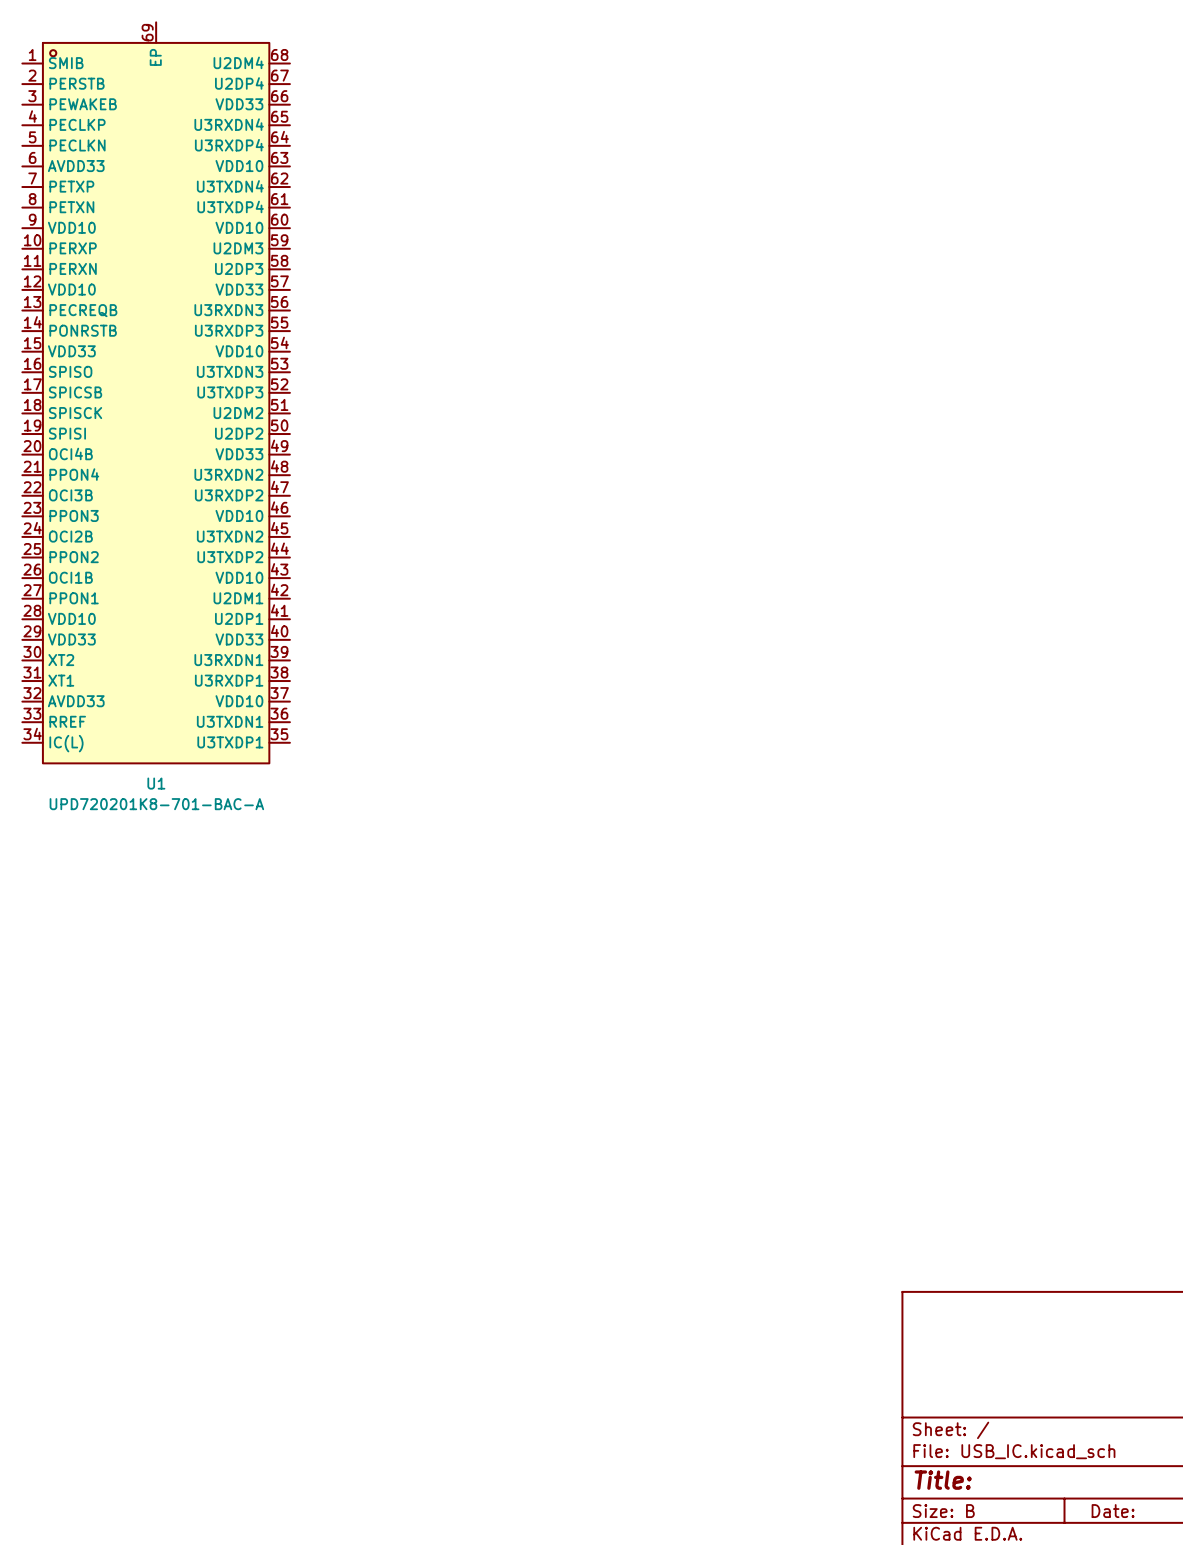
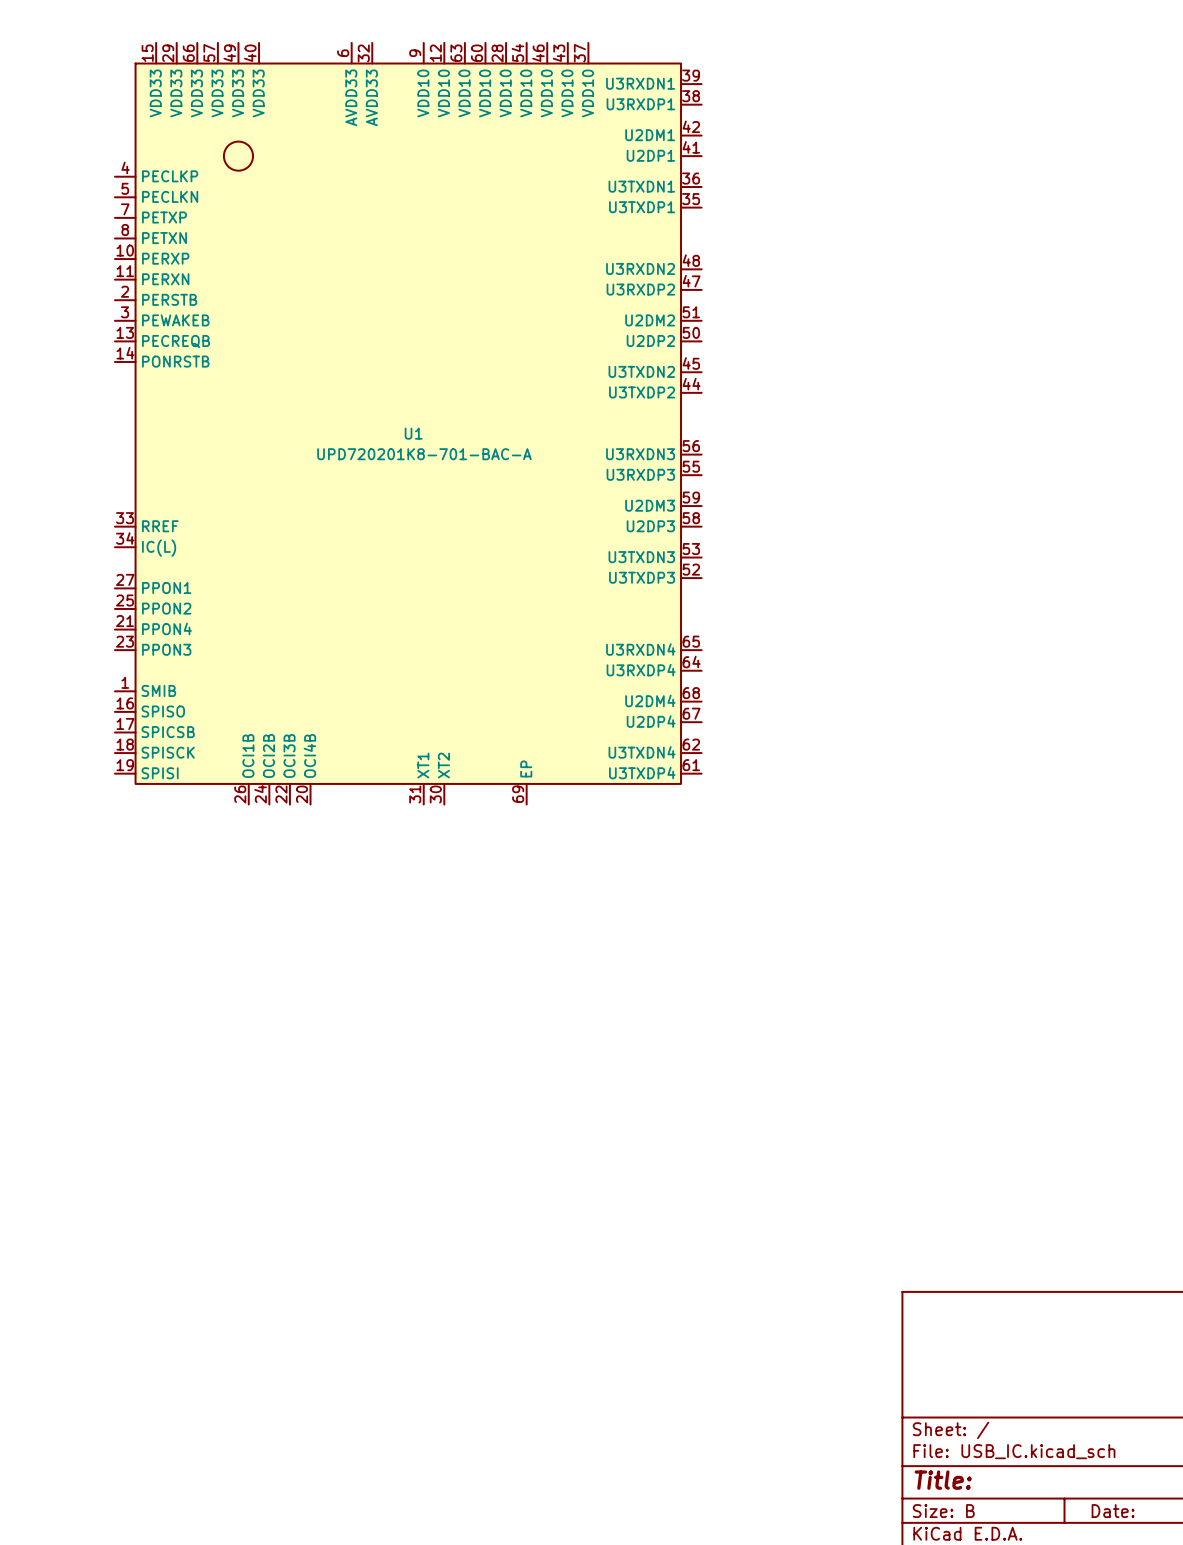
U1 symbol: [22, 22, 290, 764] -> [114, 42, 702, 805]
U1 name position: U1 (156, 783) -> U1 (413, 433)
U1 value position: UPD720201K8-701-BAC-A (156, 804) -> UPD720201K8-701-BAC-A (424, 454)

